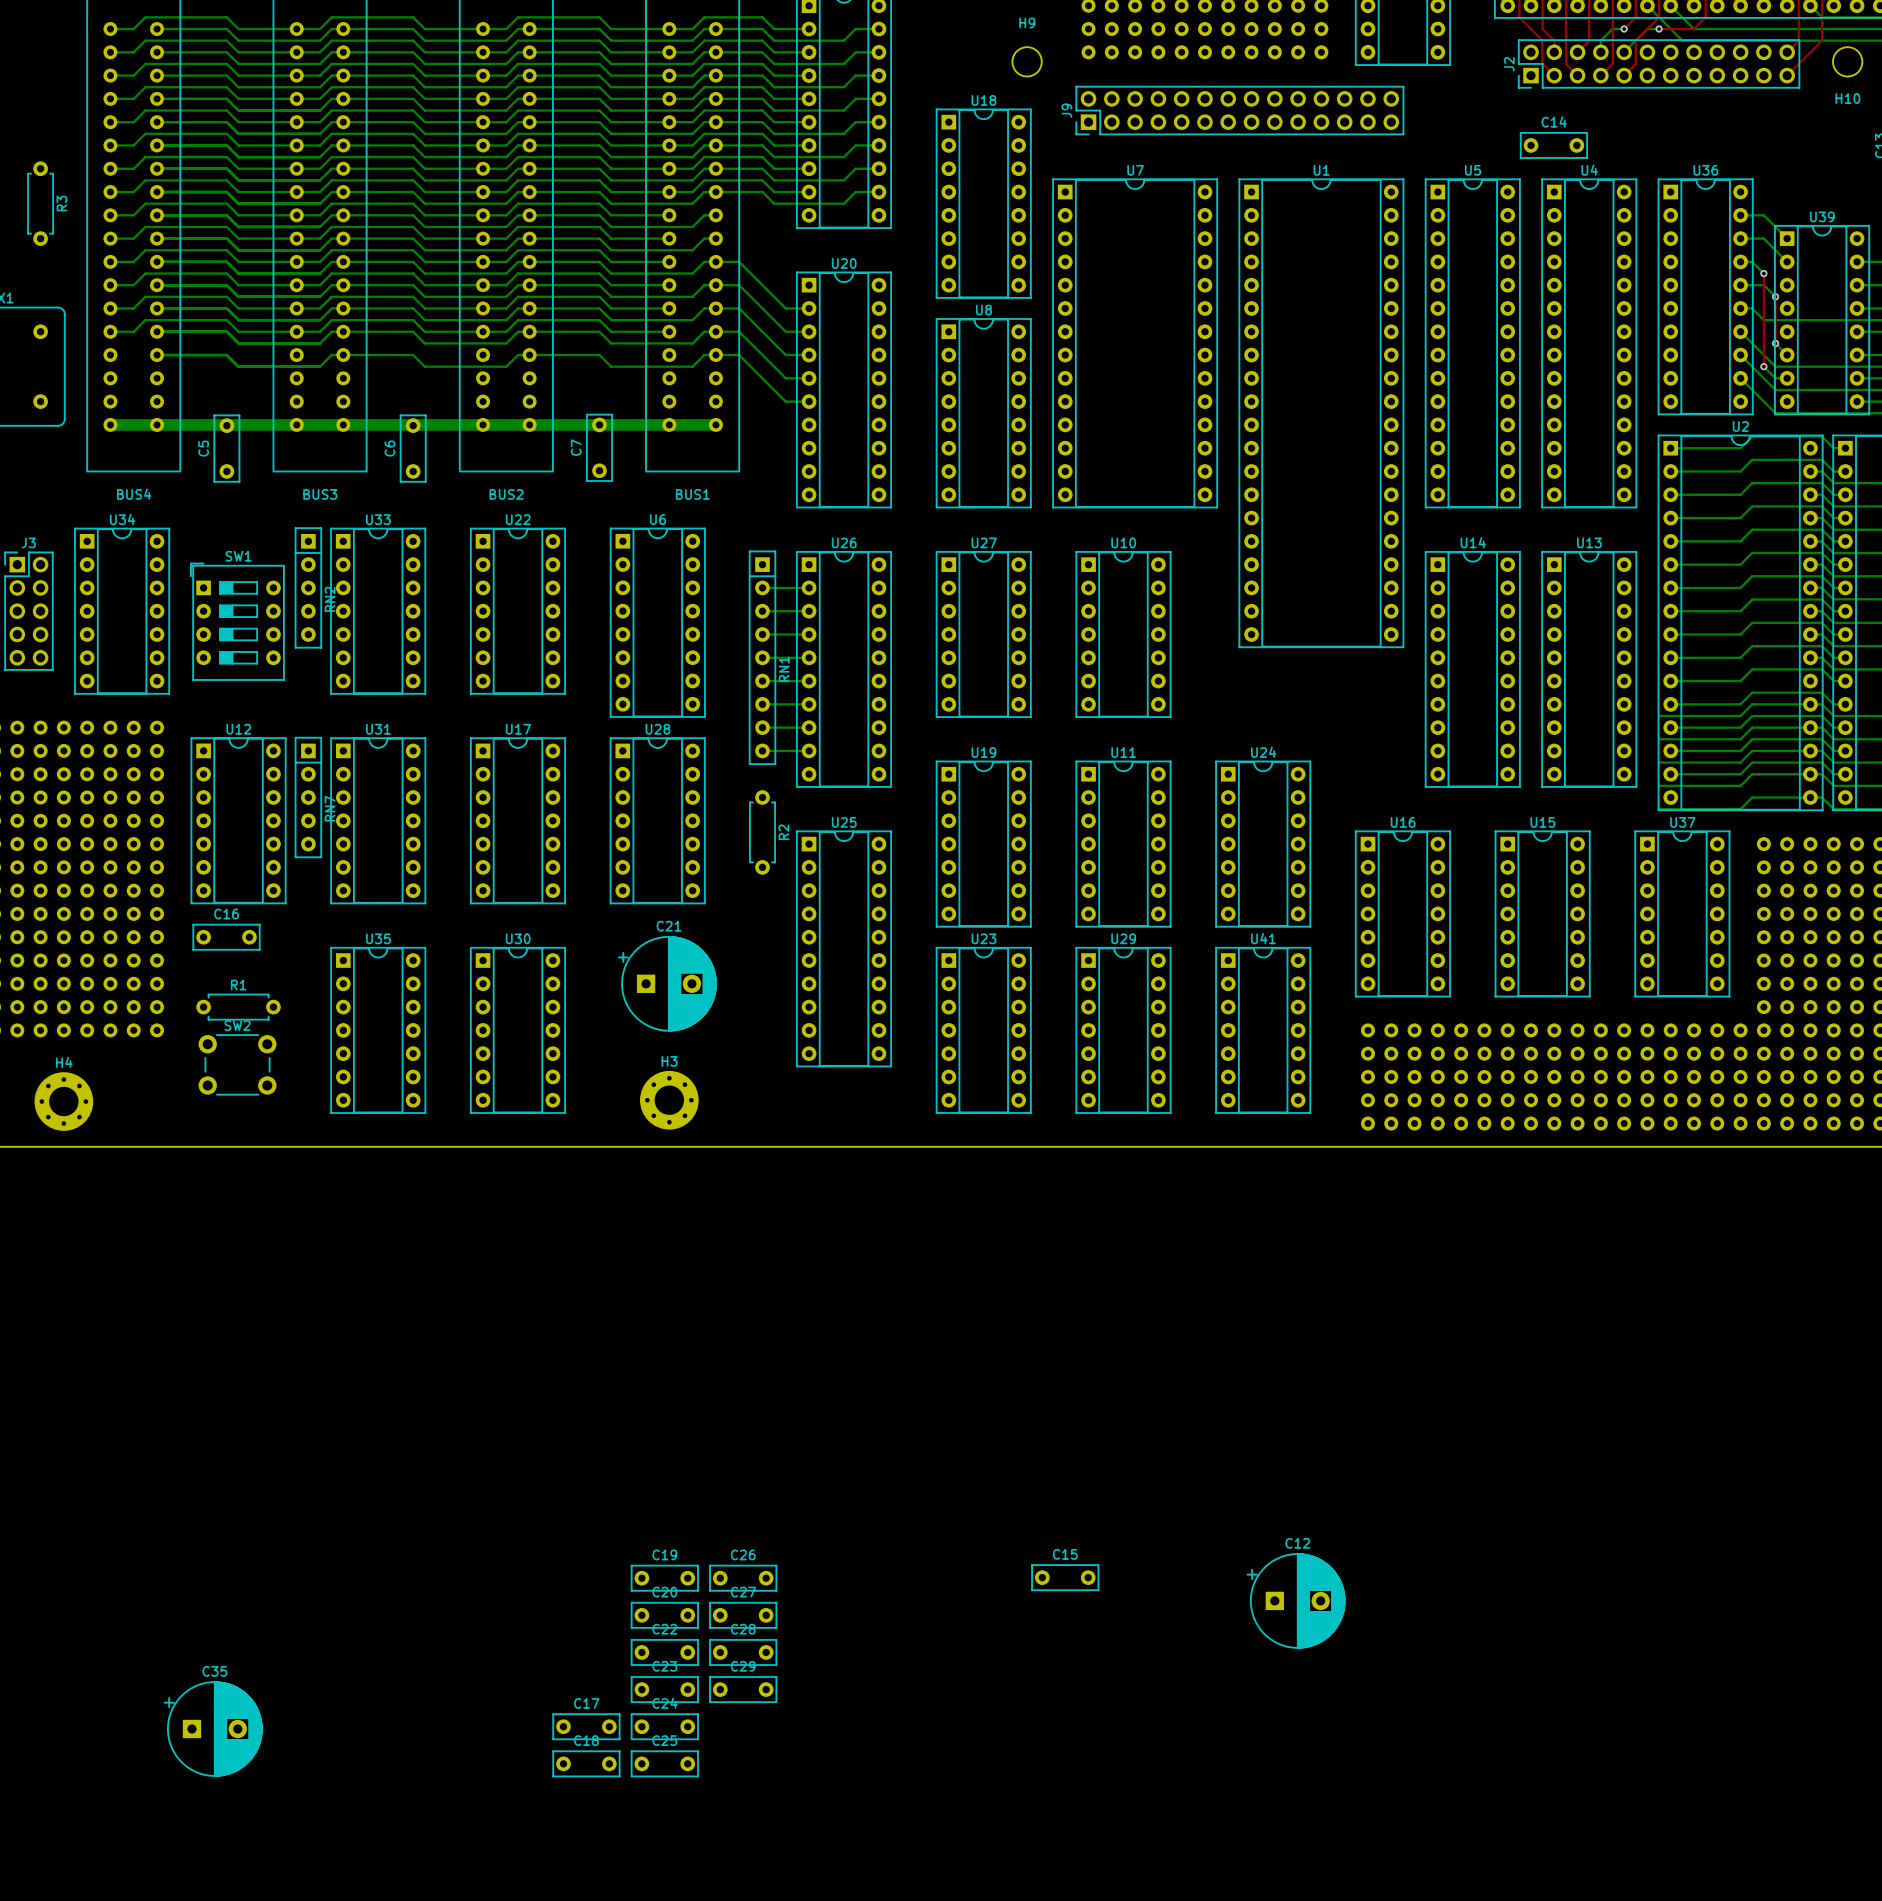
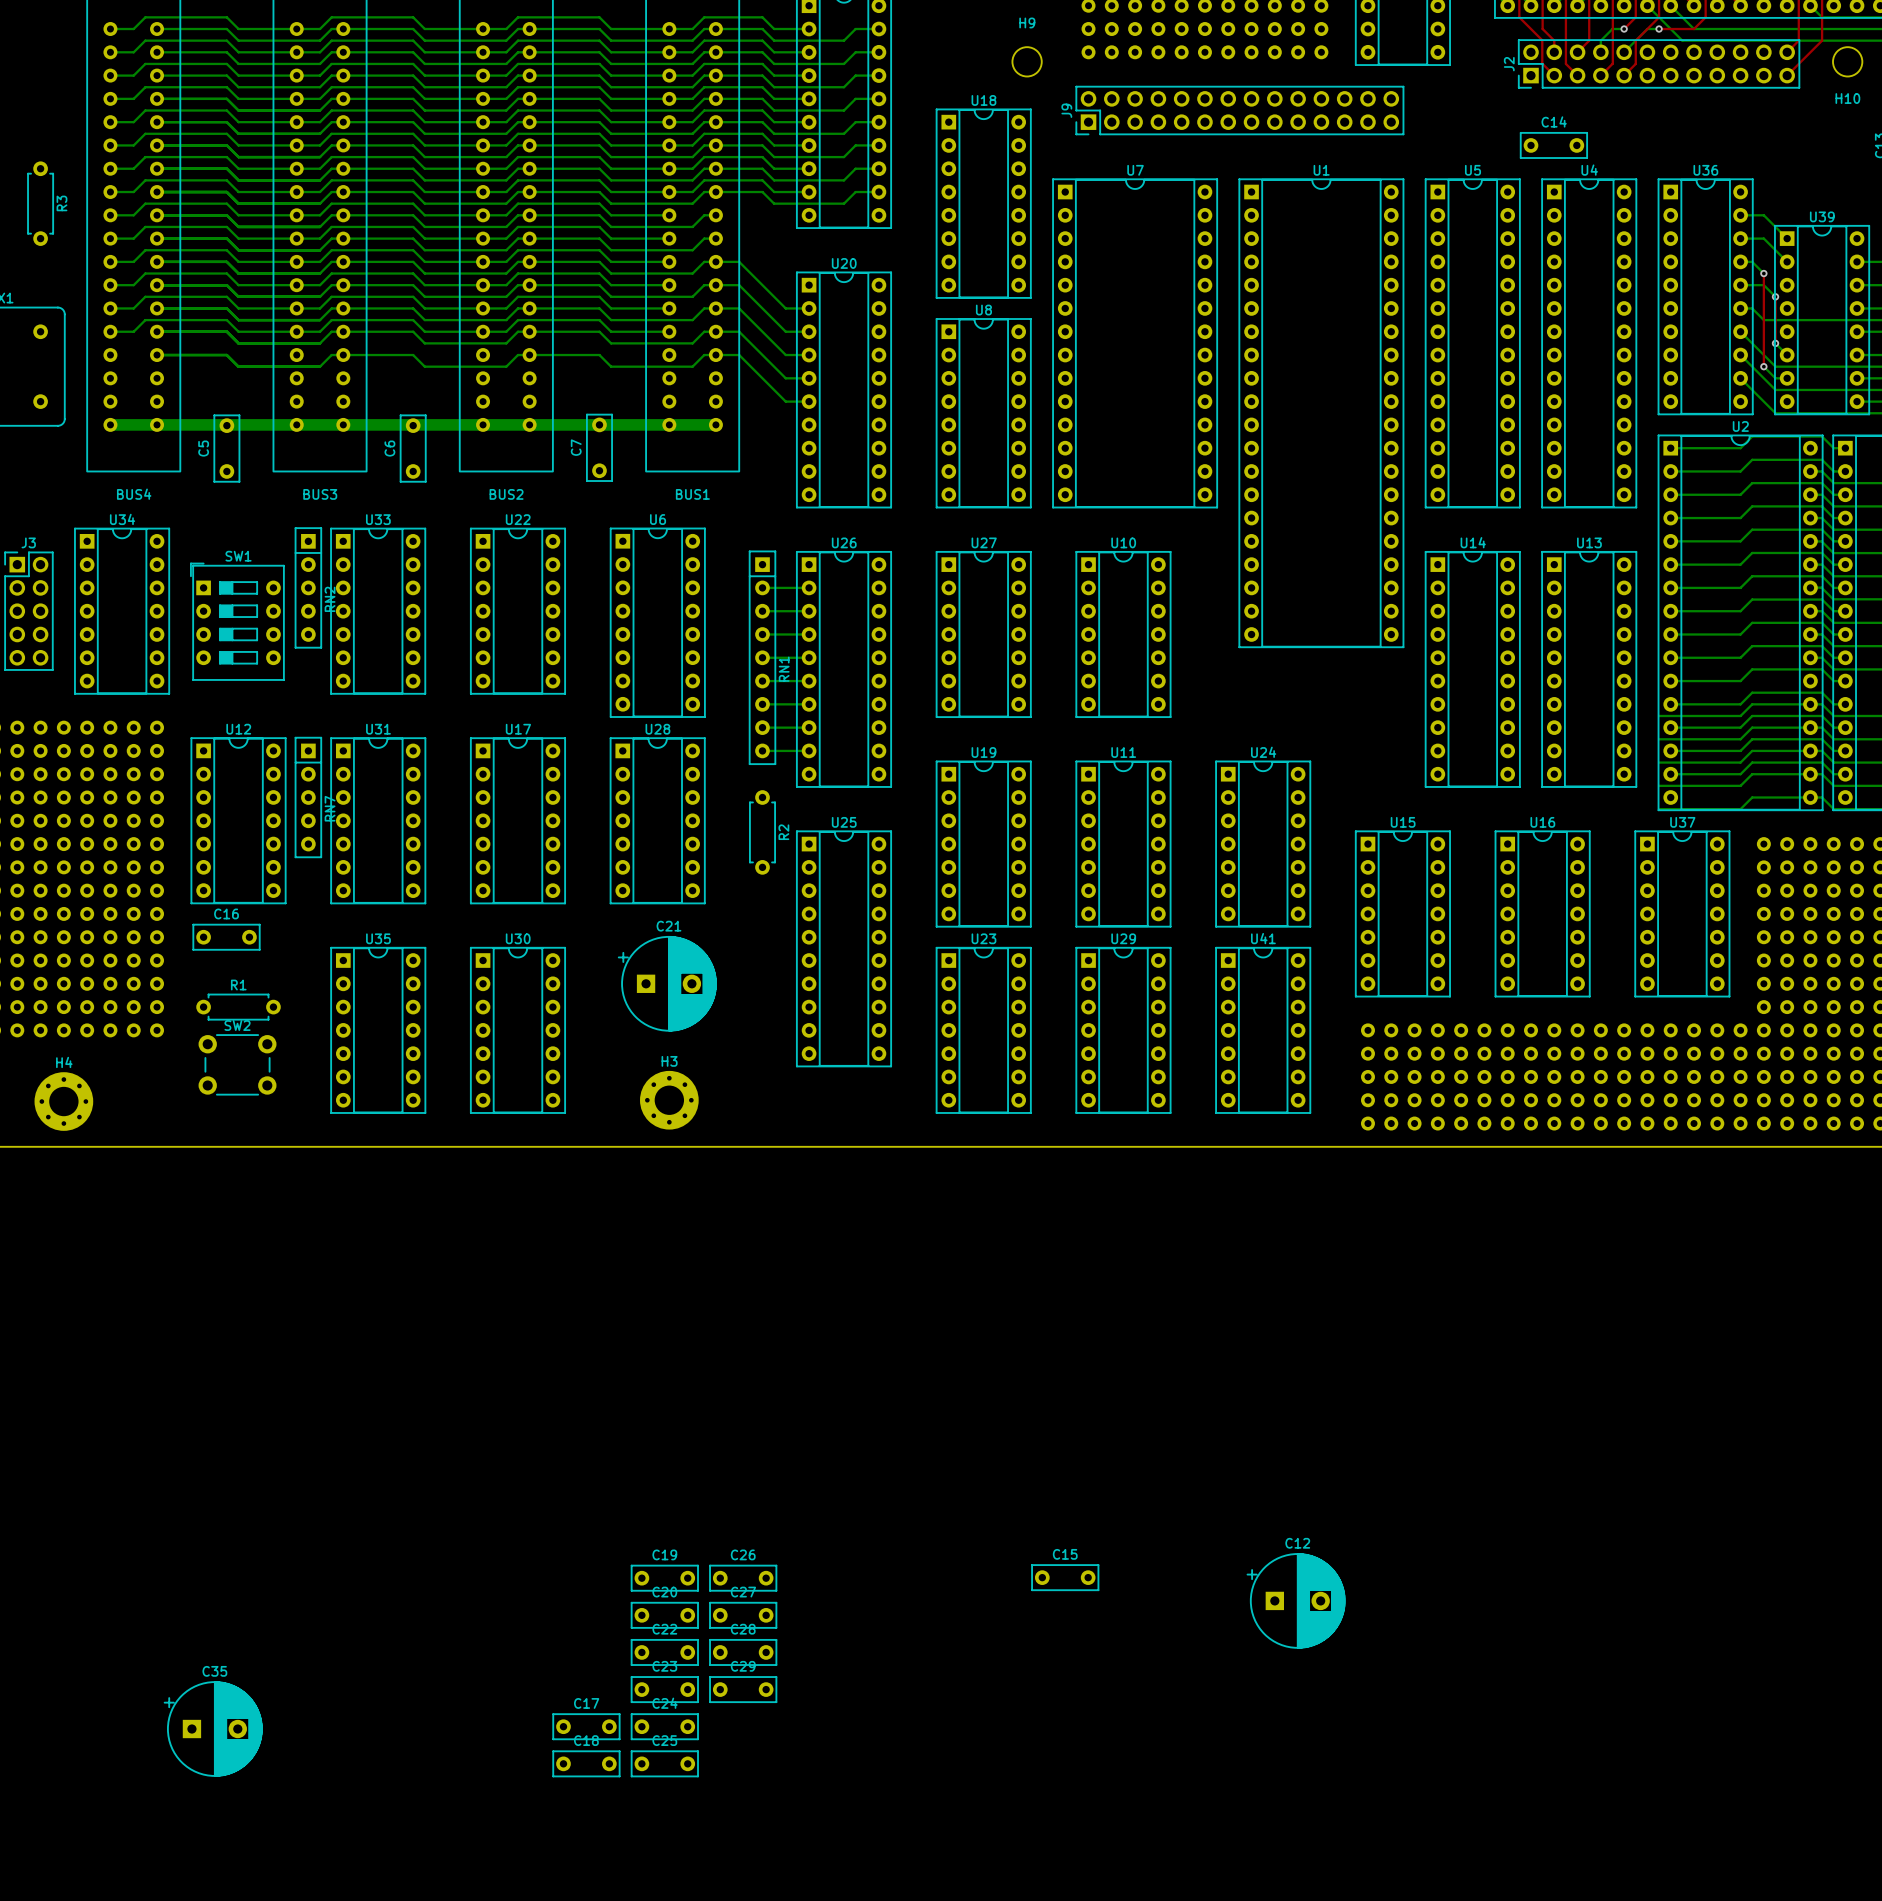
U16 name: U16 (1403, 822) -> U15 (1403, 822)
U15 name: U15 (1542, 822) -> U16 (1542, 822)

